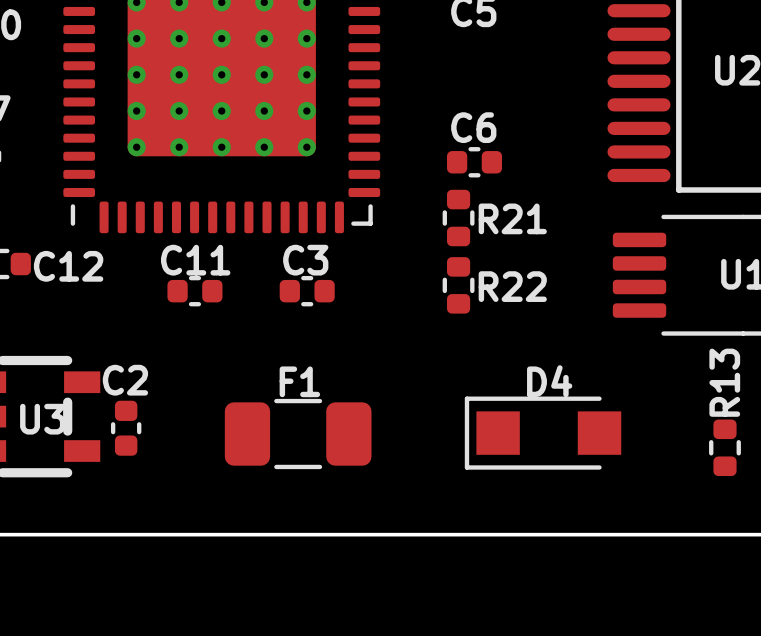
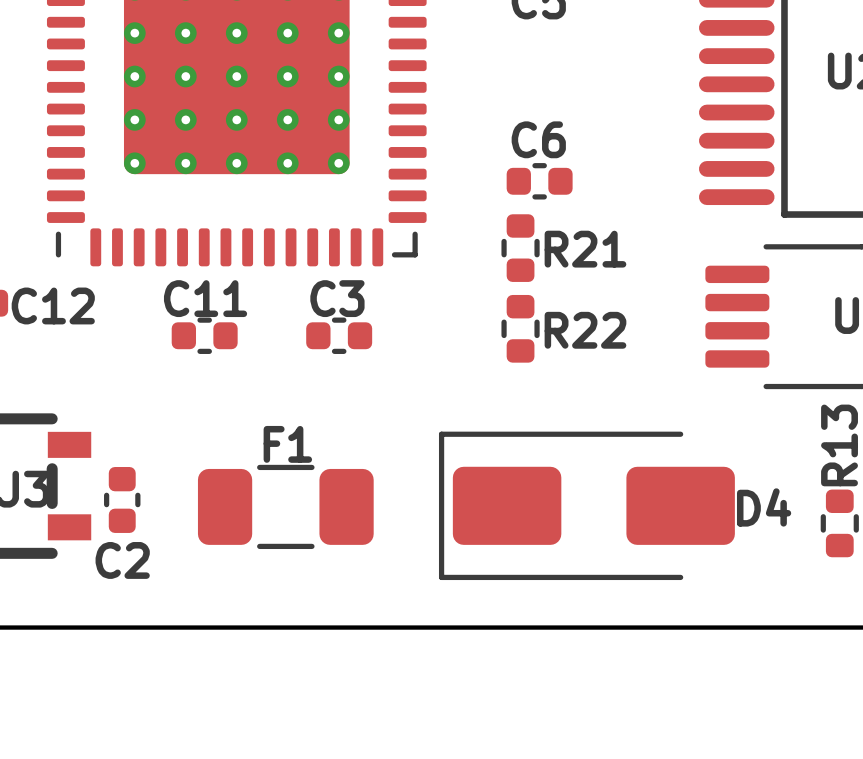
C2 name position: C2 (125, 380) -> C2 (122, 560)
D4 name position: D4 (549, 381) -> D4 (764, 507)
D4 footprint: [464, 396, 622, 470] -> [438, 431, 735, 581]
F1 position: (298, 434) -> (285, 506)

